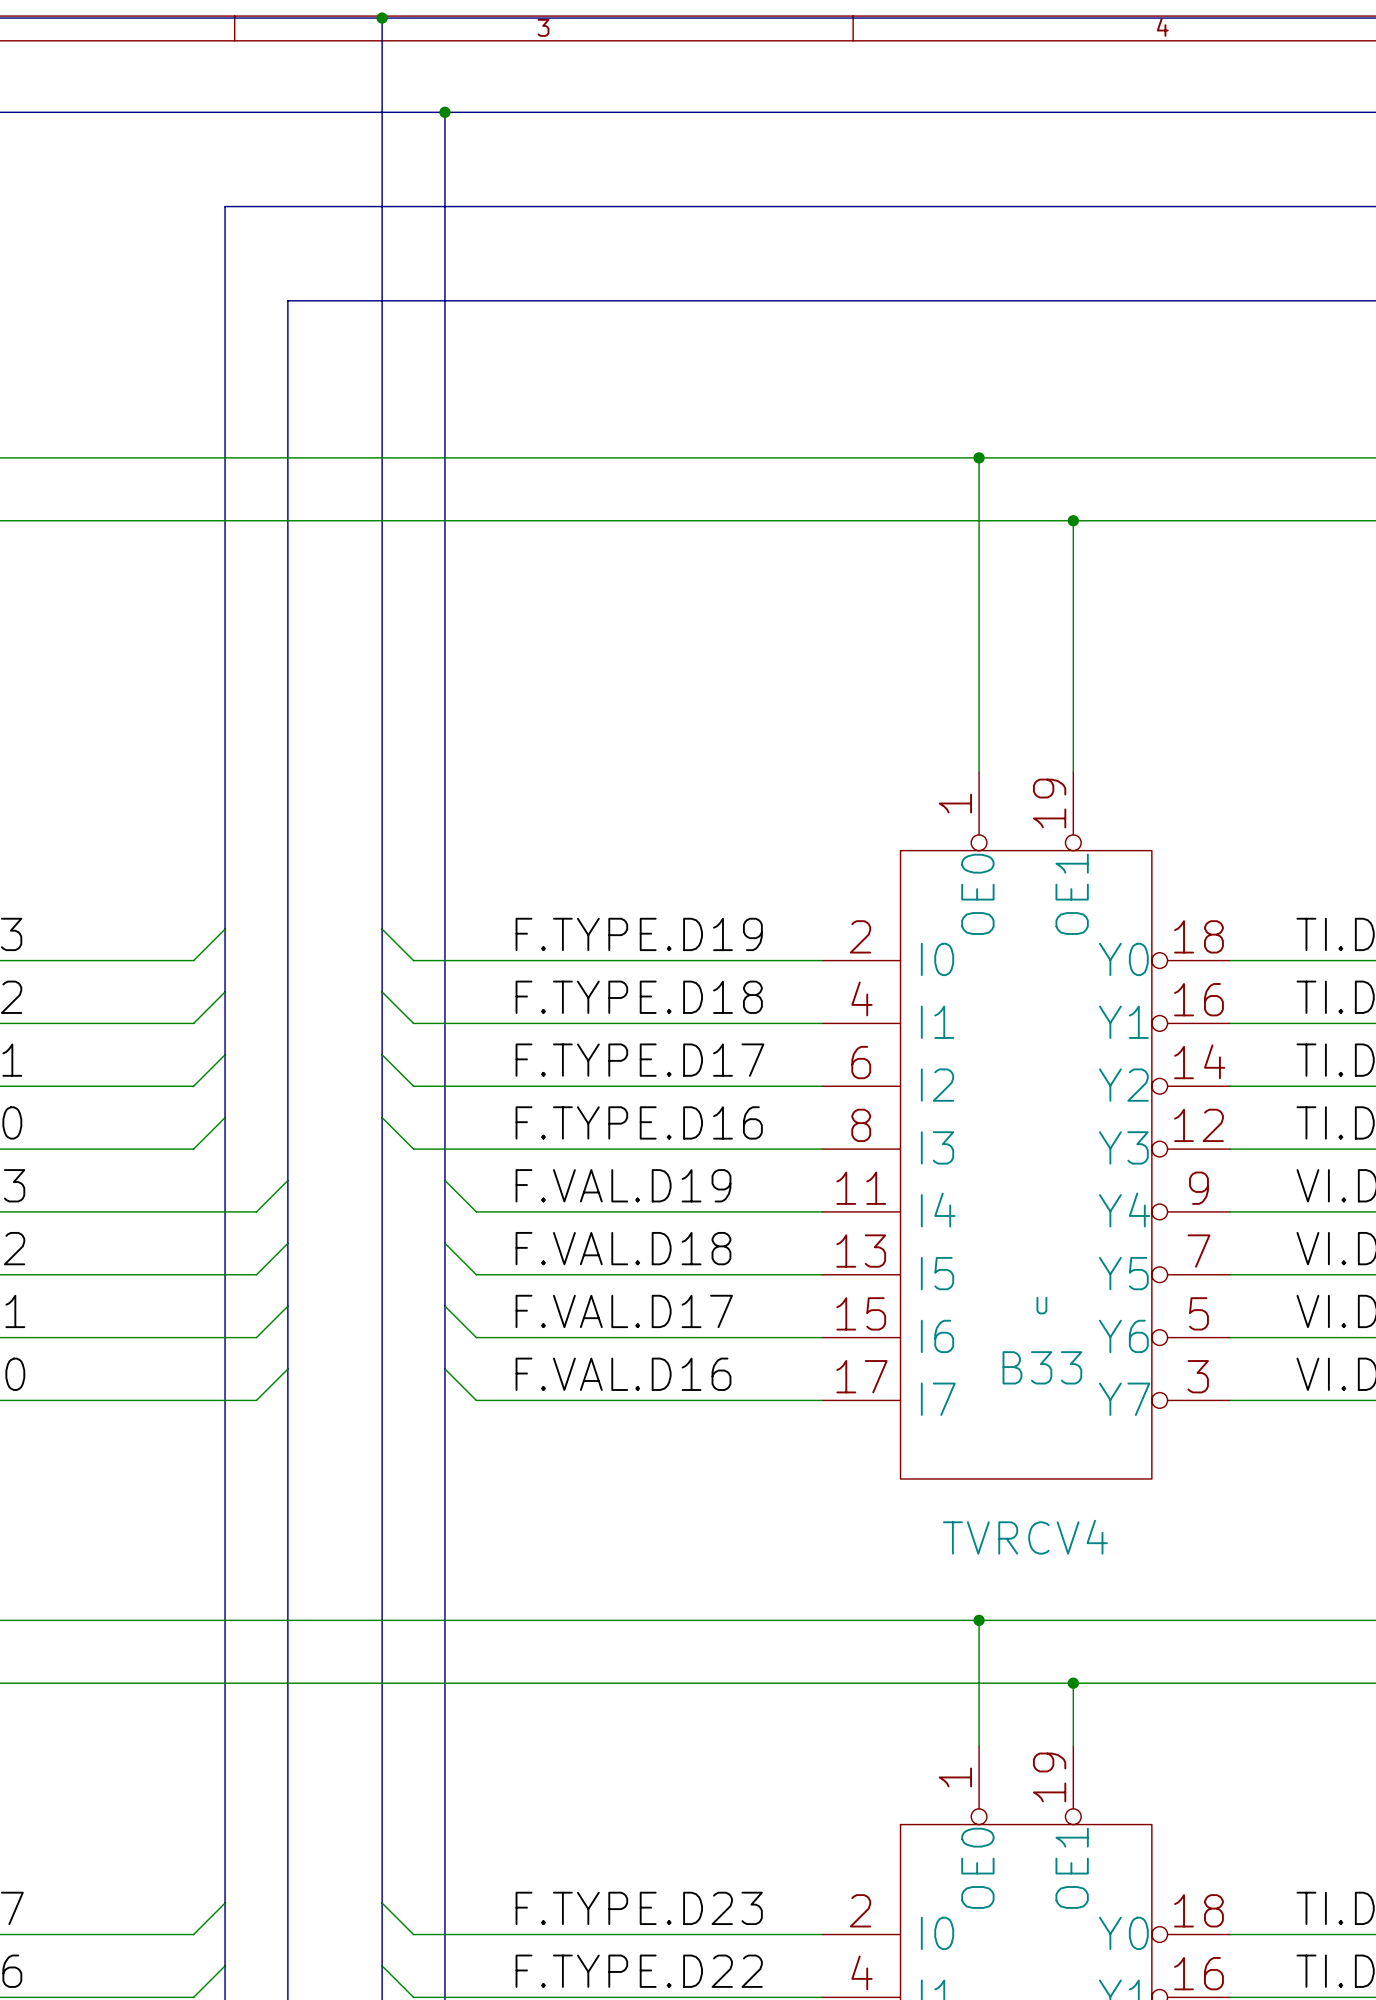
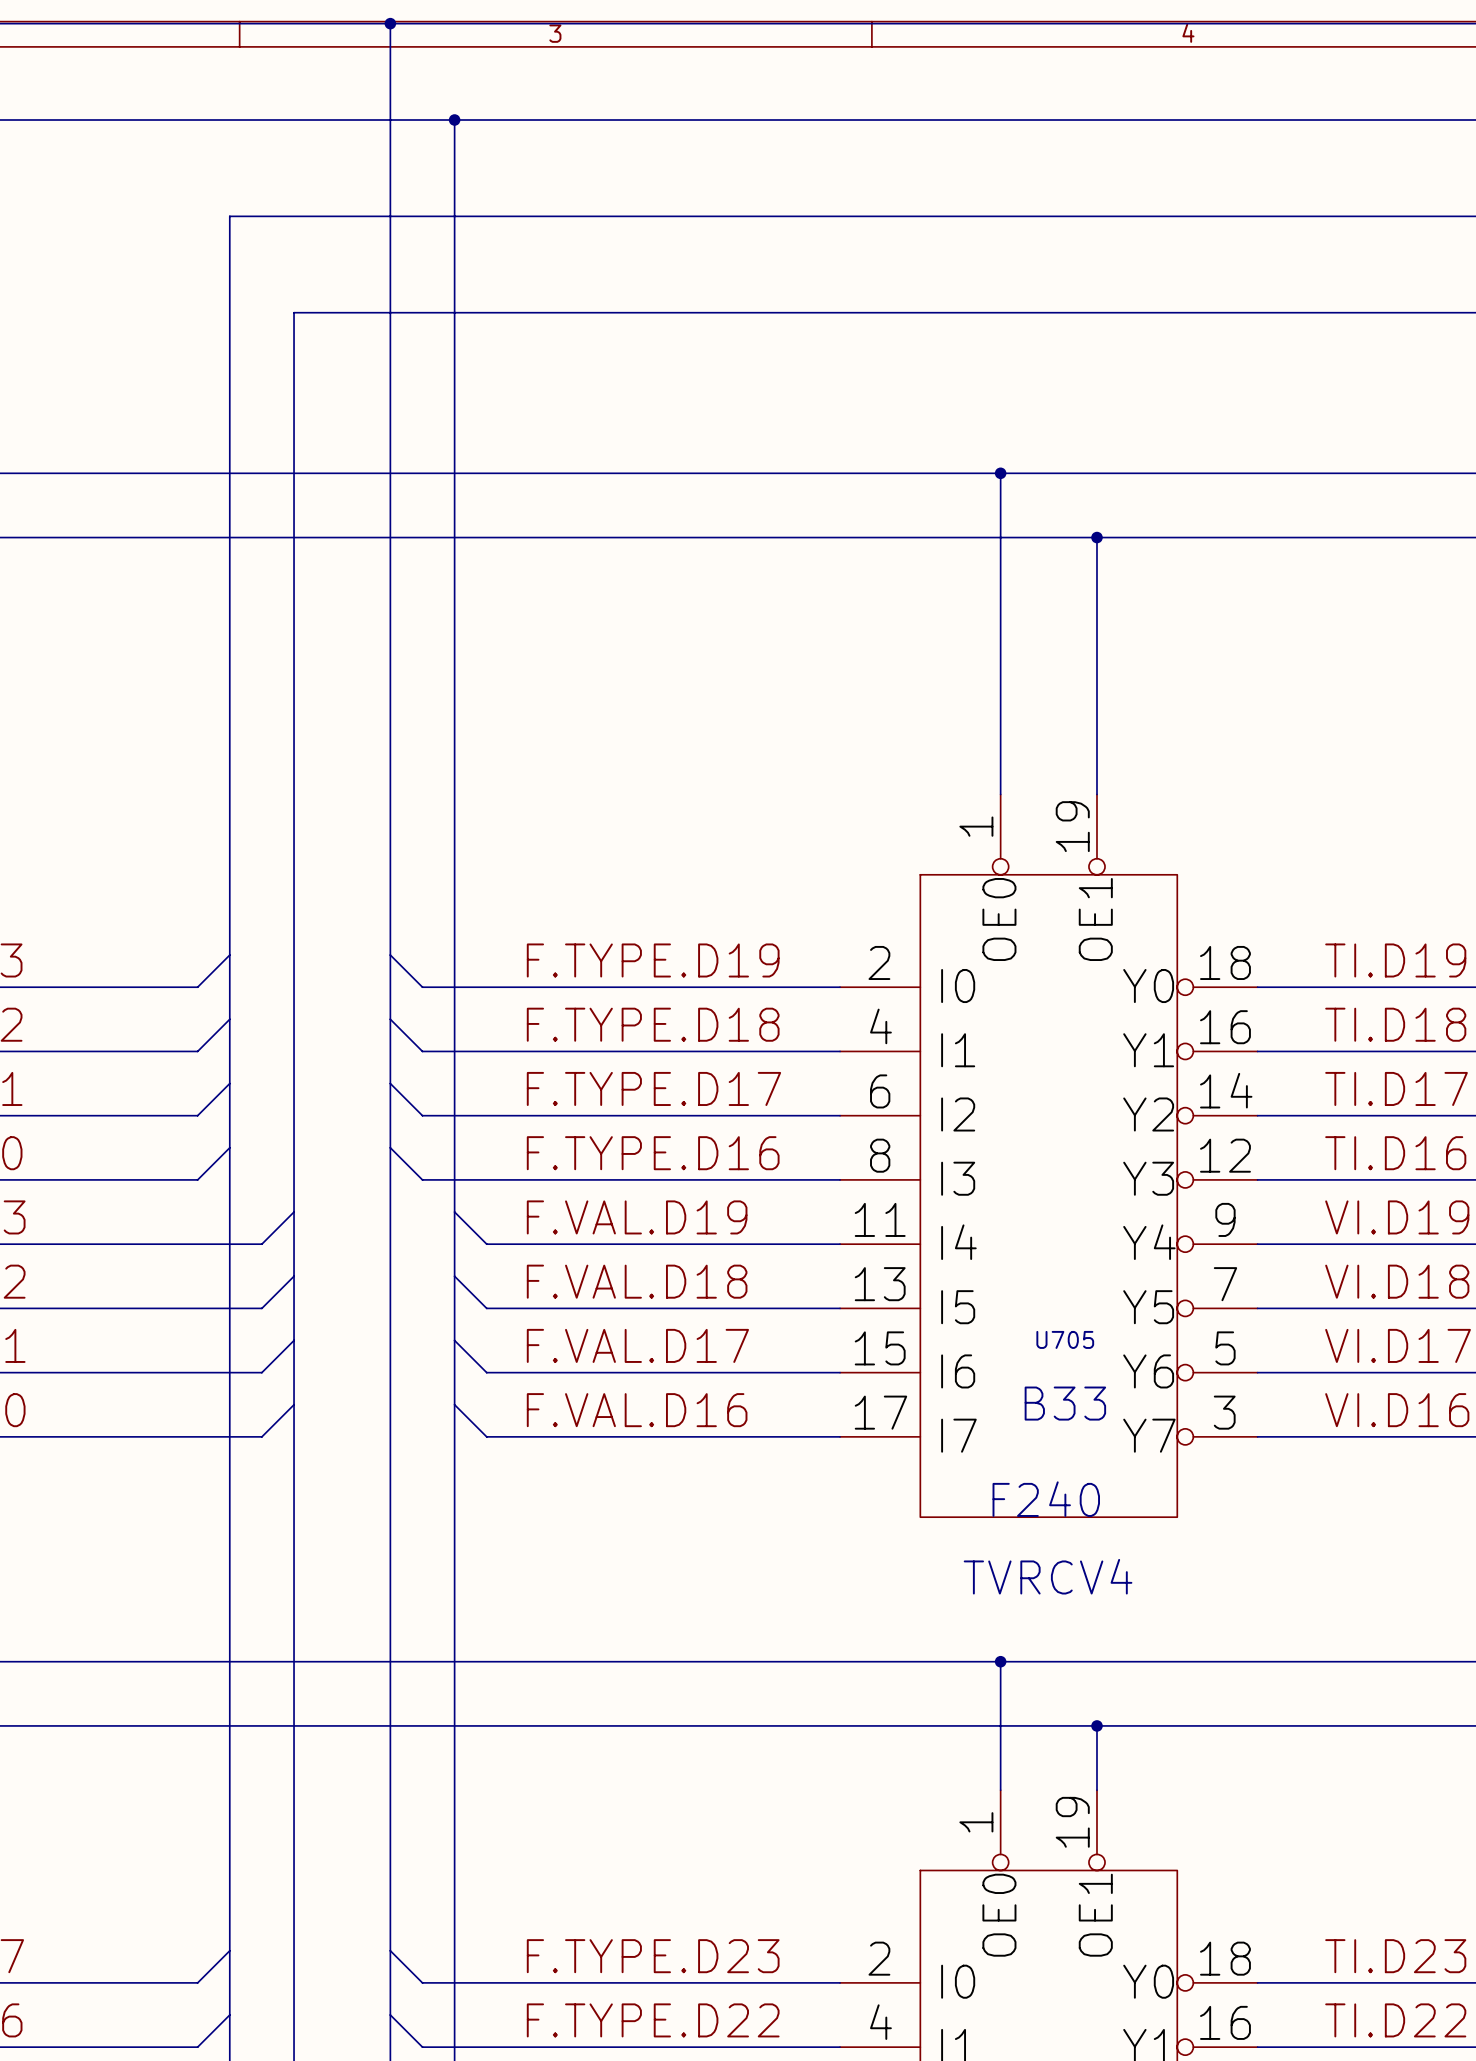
U name: U (1041, 1305) -> U705 (1065, 1339)
U value: none -> F240 (1046, 1499)

